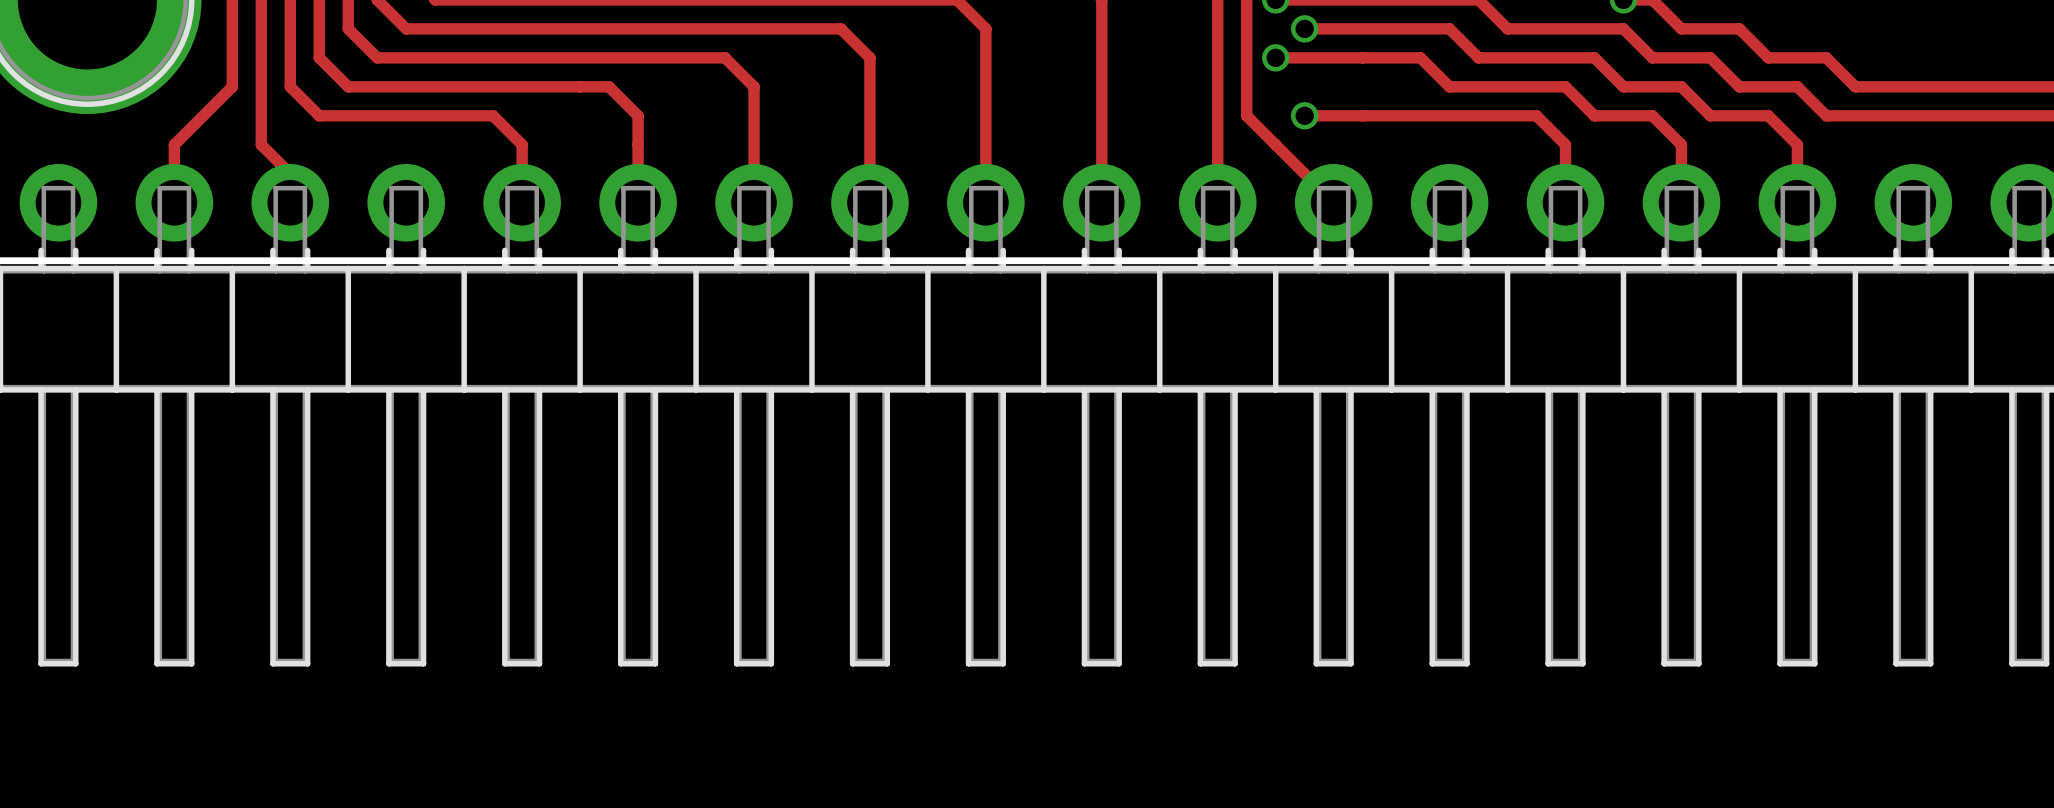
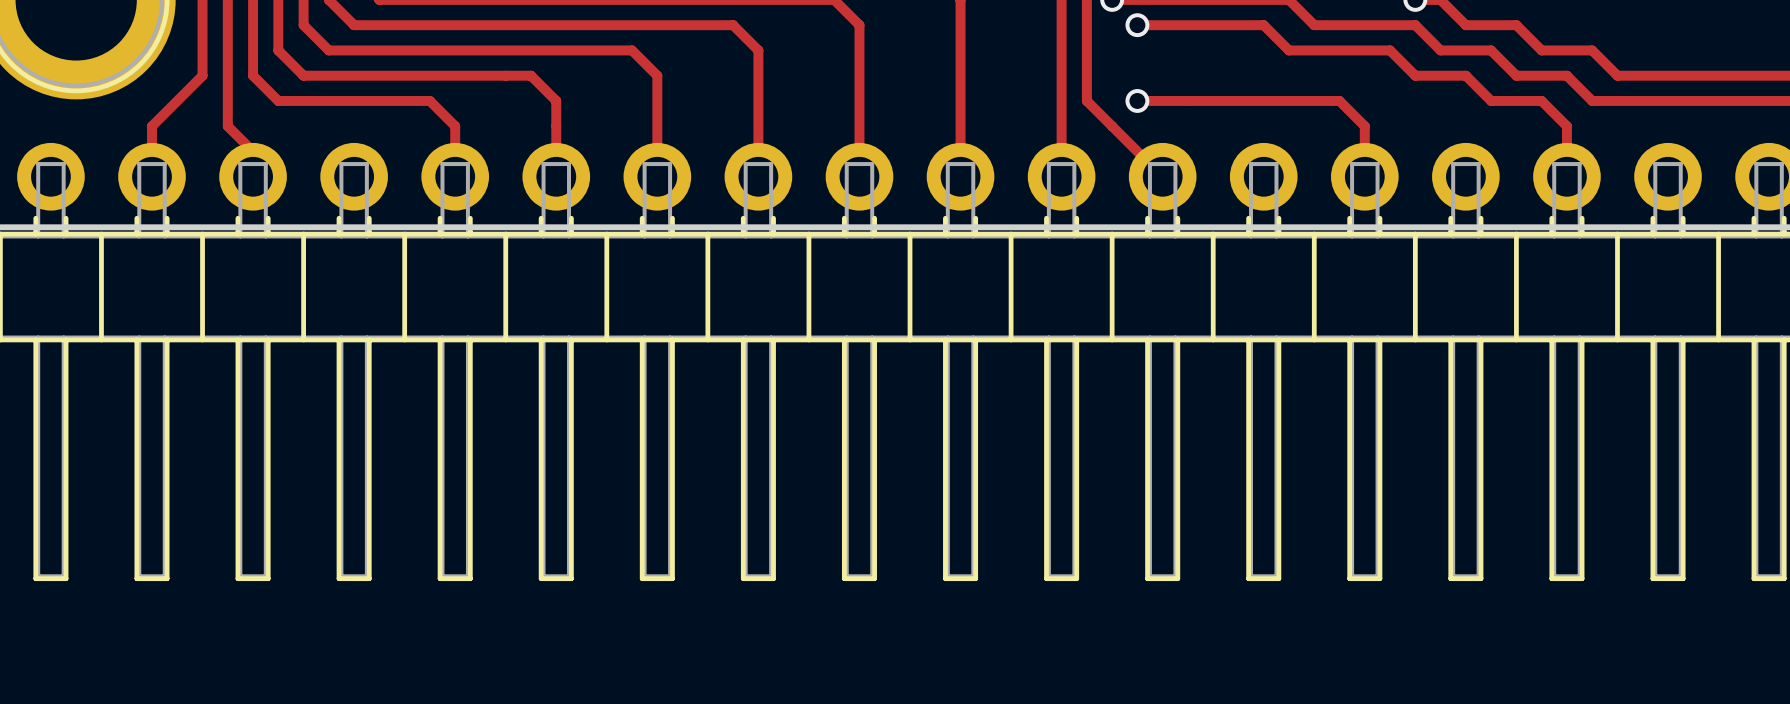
track: (1275, 57) (1420, 57) (1449, 86) (1565, 86) (1594, 115) (1652, 115) (1681, 144) (1681, 202) -> none
via: (1275, 57) -> none

